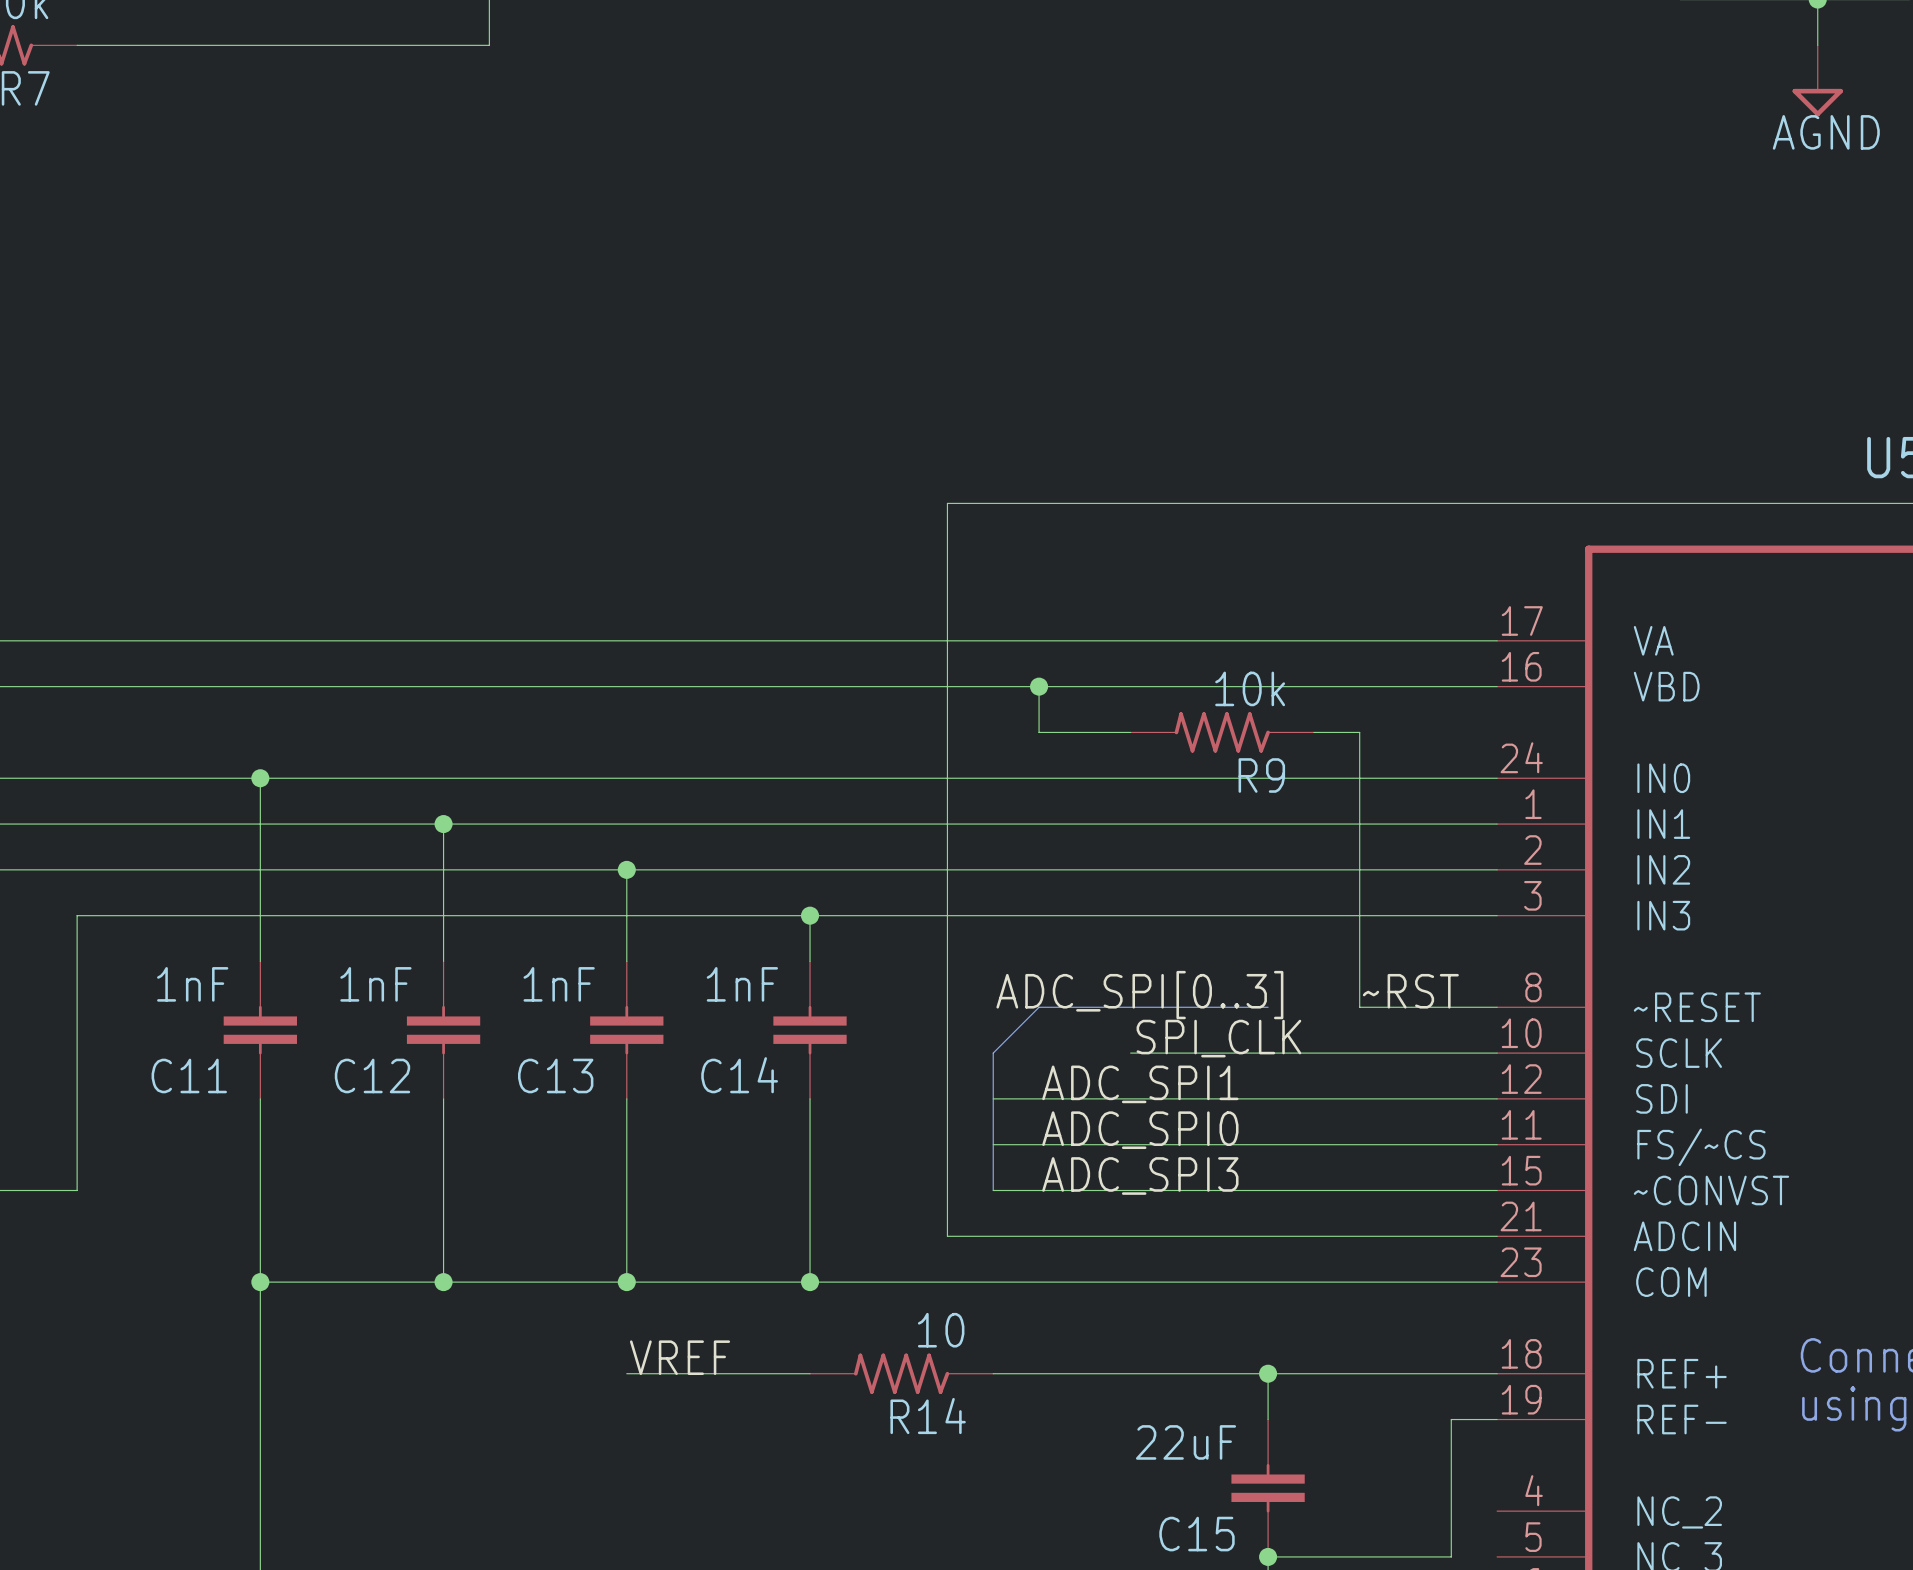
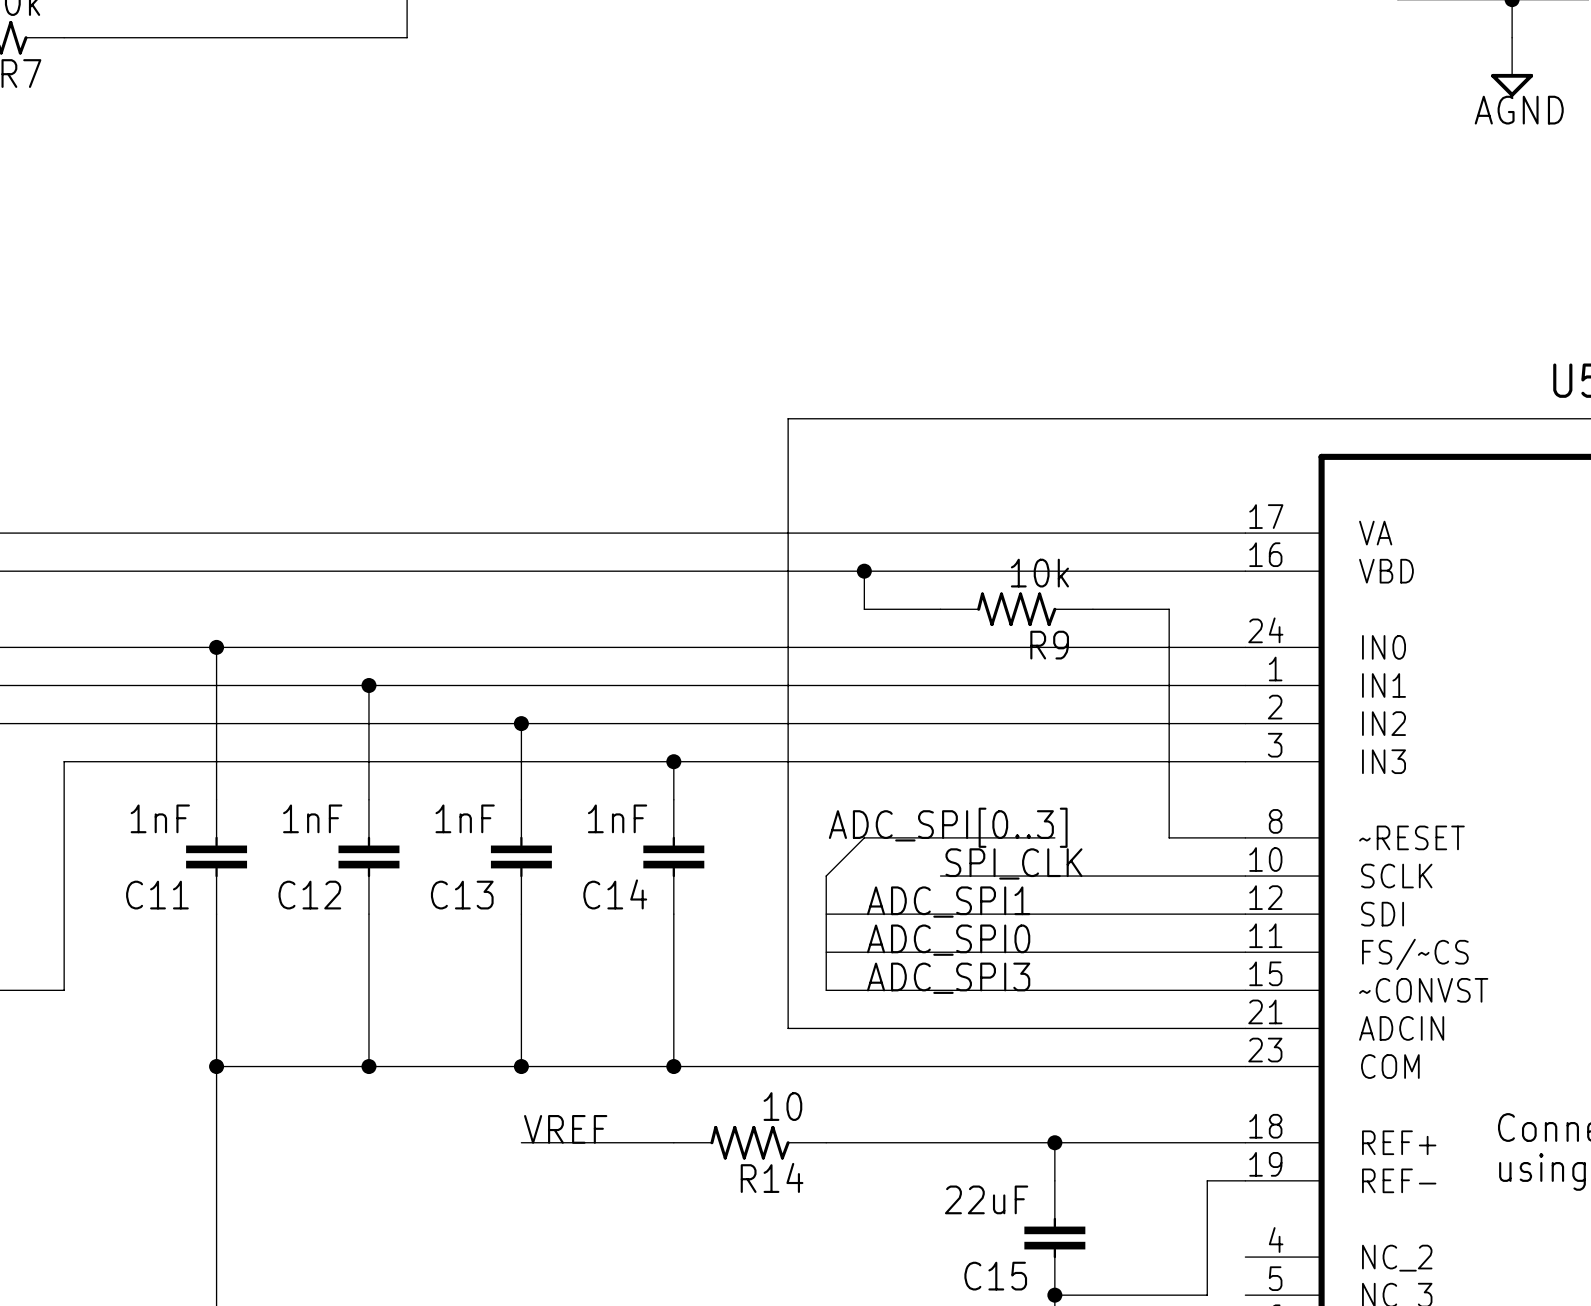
wire: (1359, 732) (1359, 1007) (1405, 1007) -> (1131, 609) (1169, 609) (1169, 837)
label: ~RST (1410, 991) -> none

